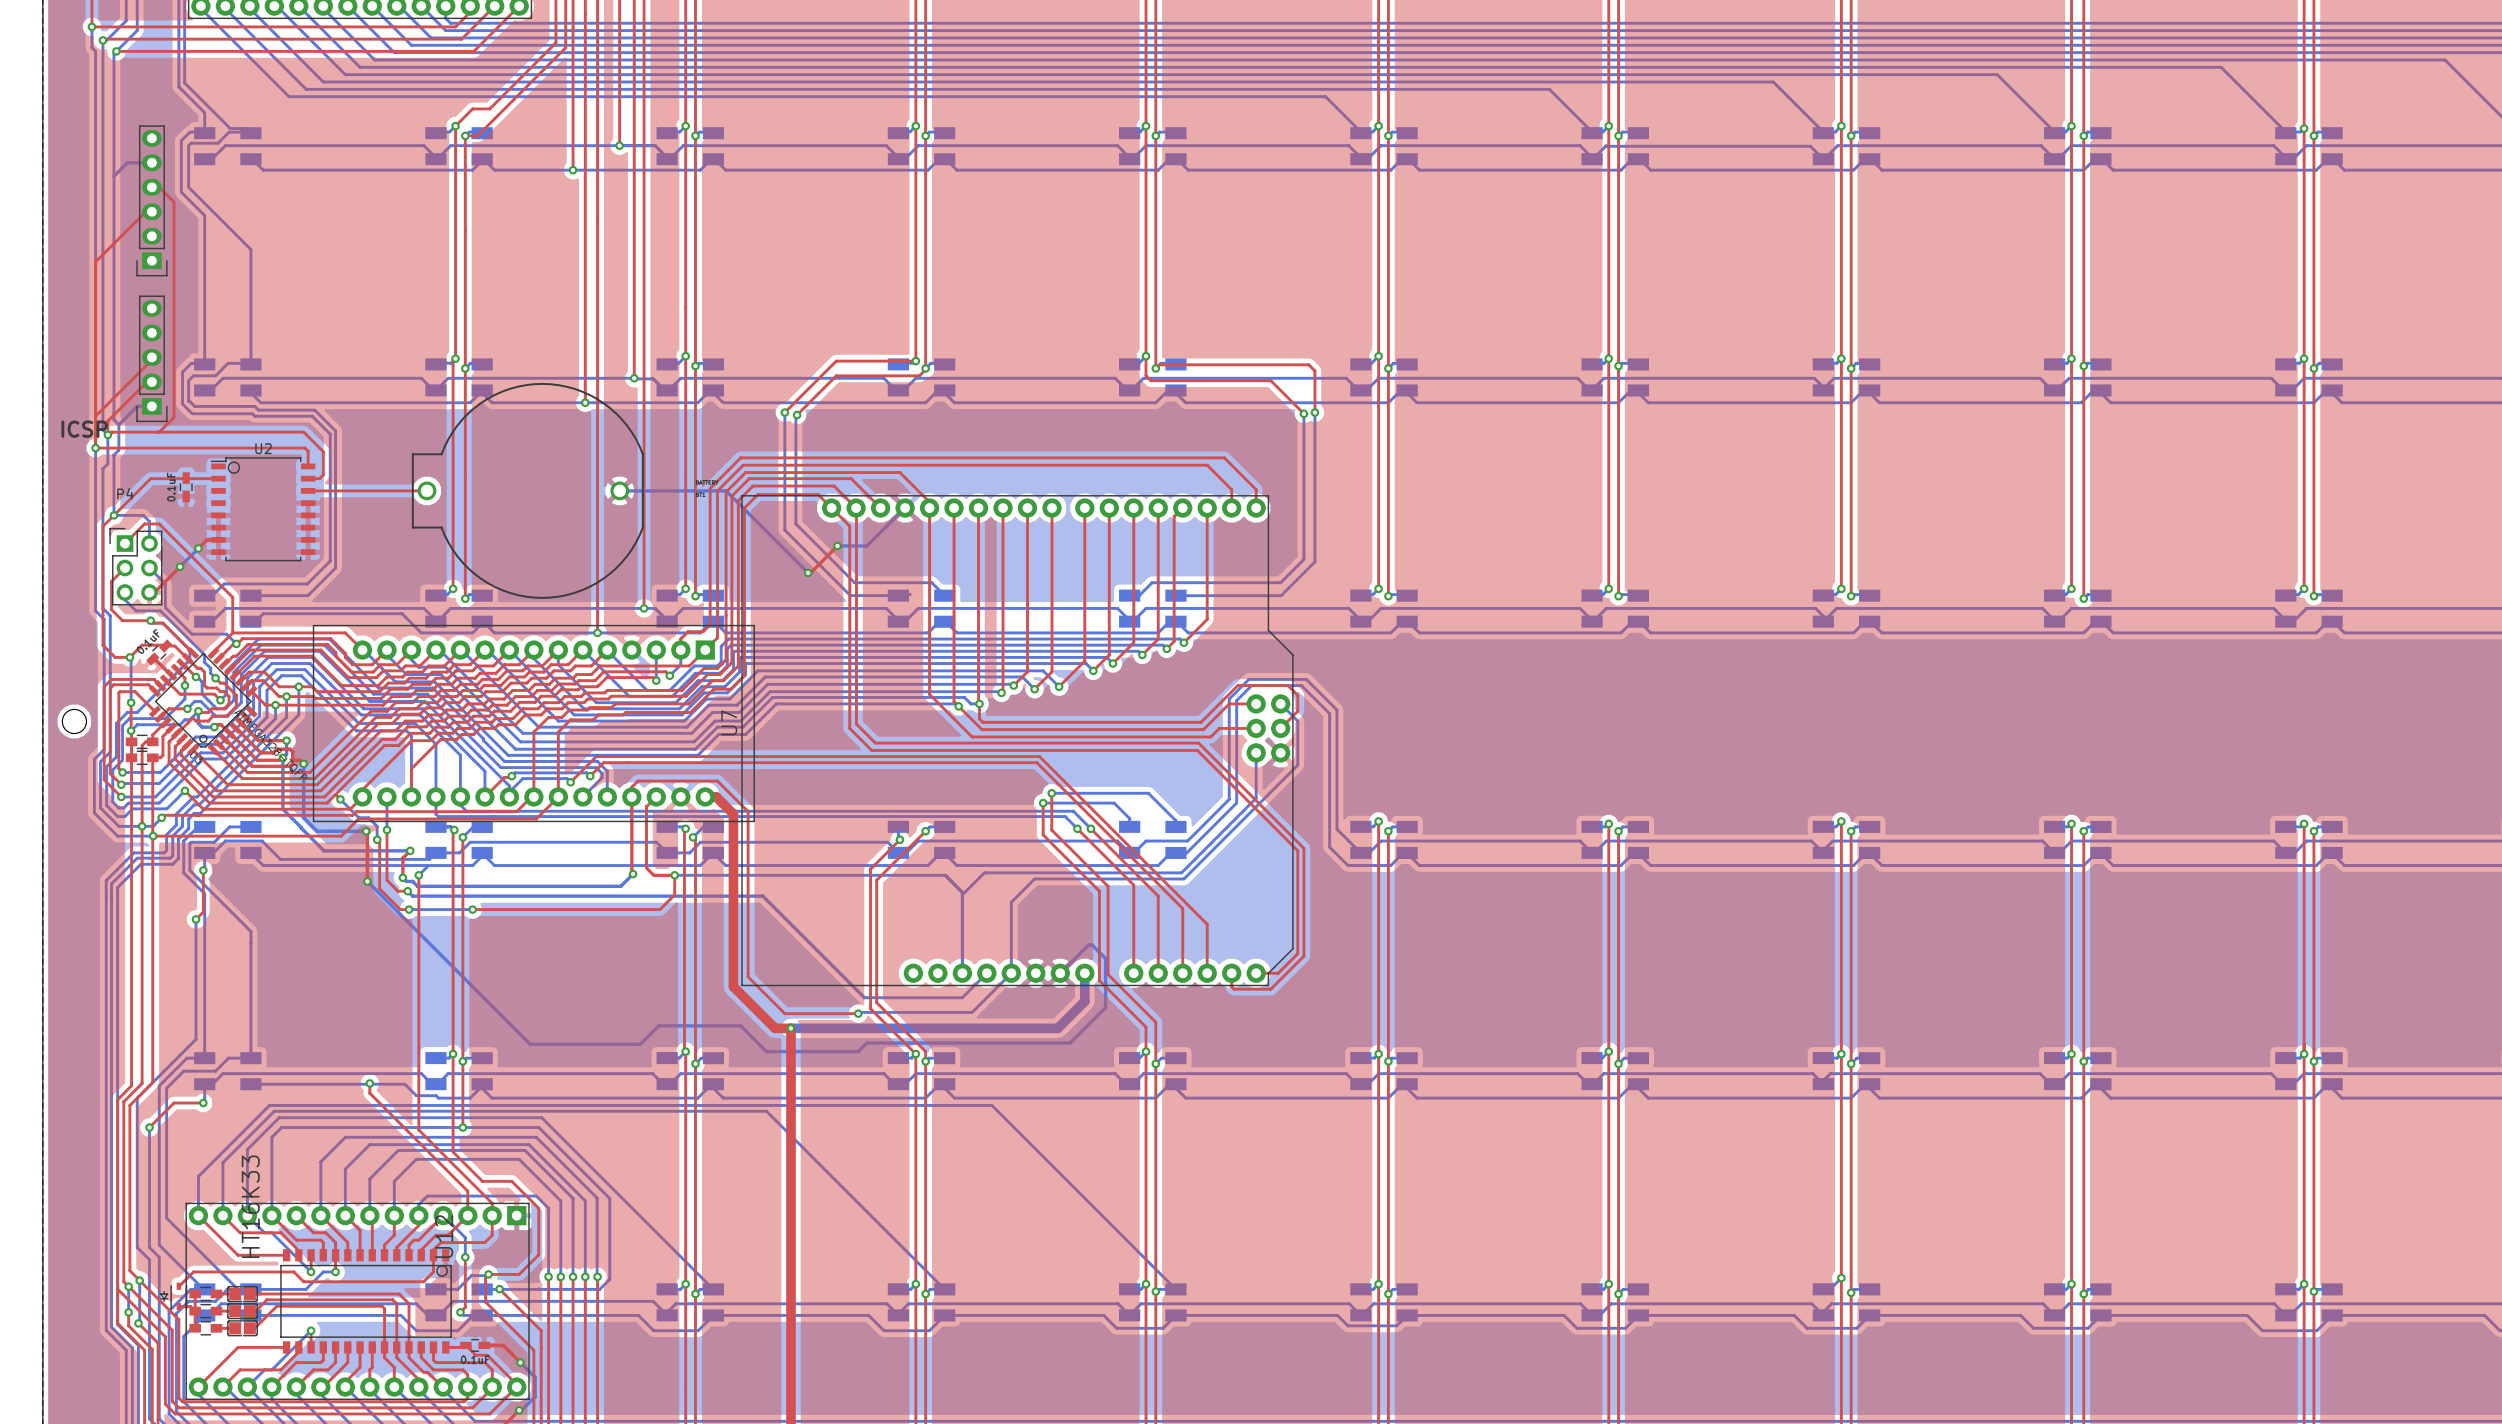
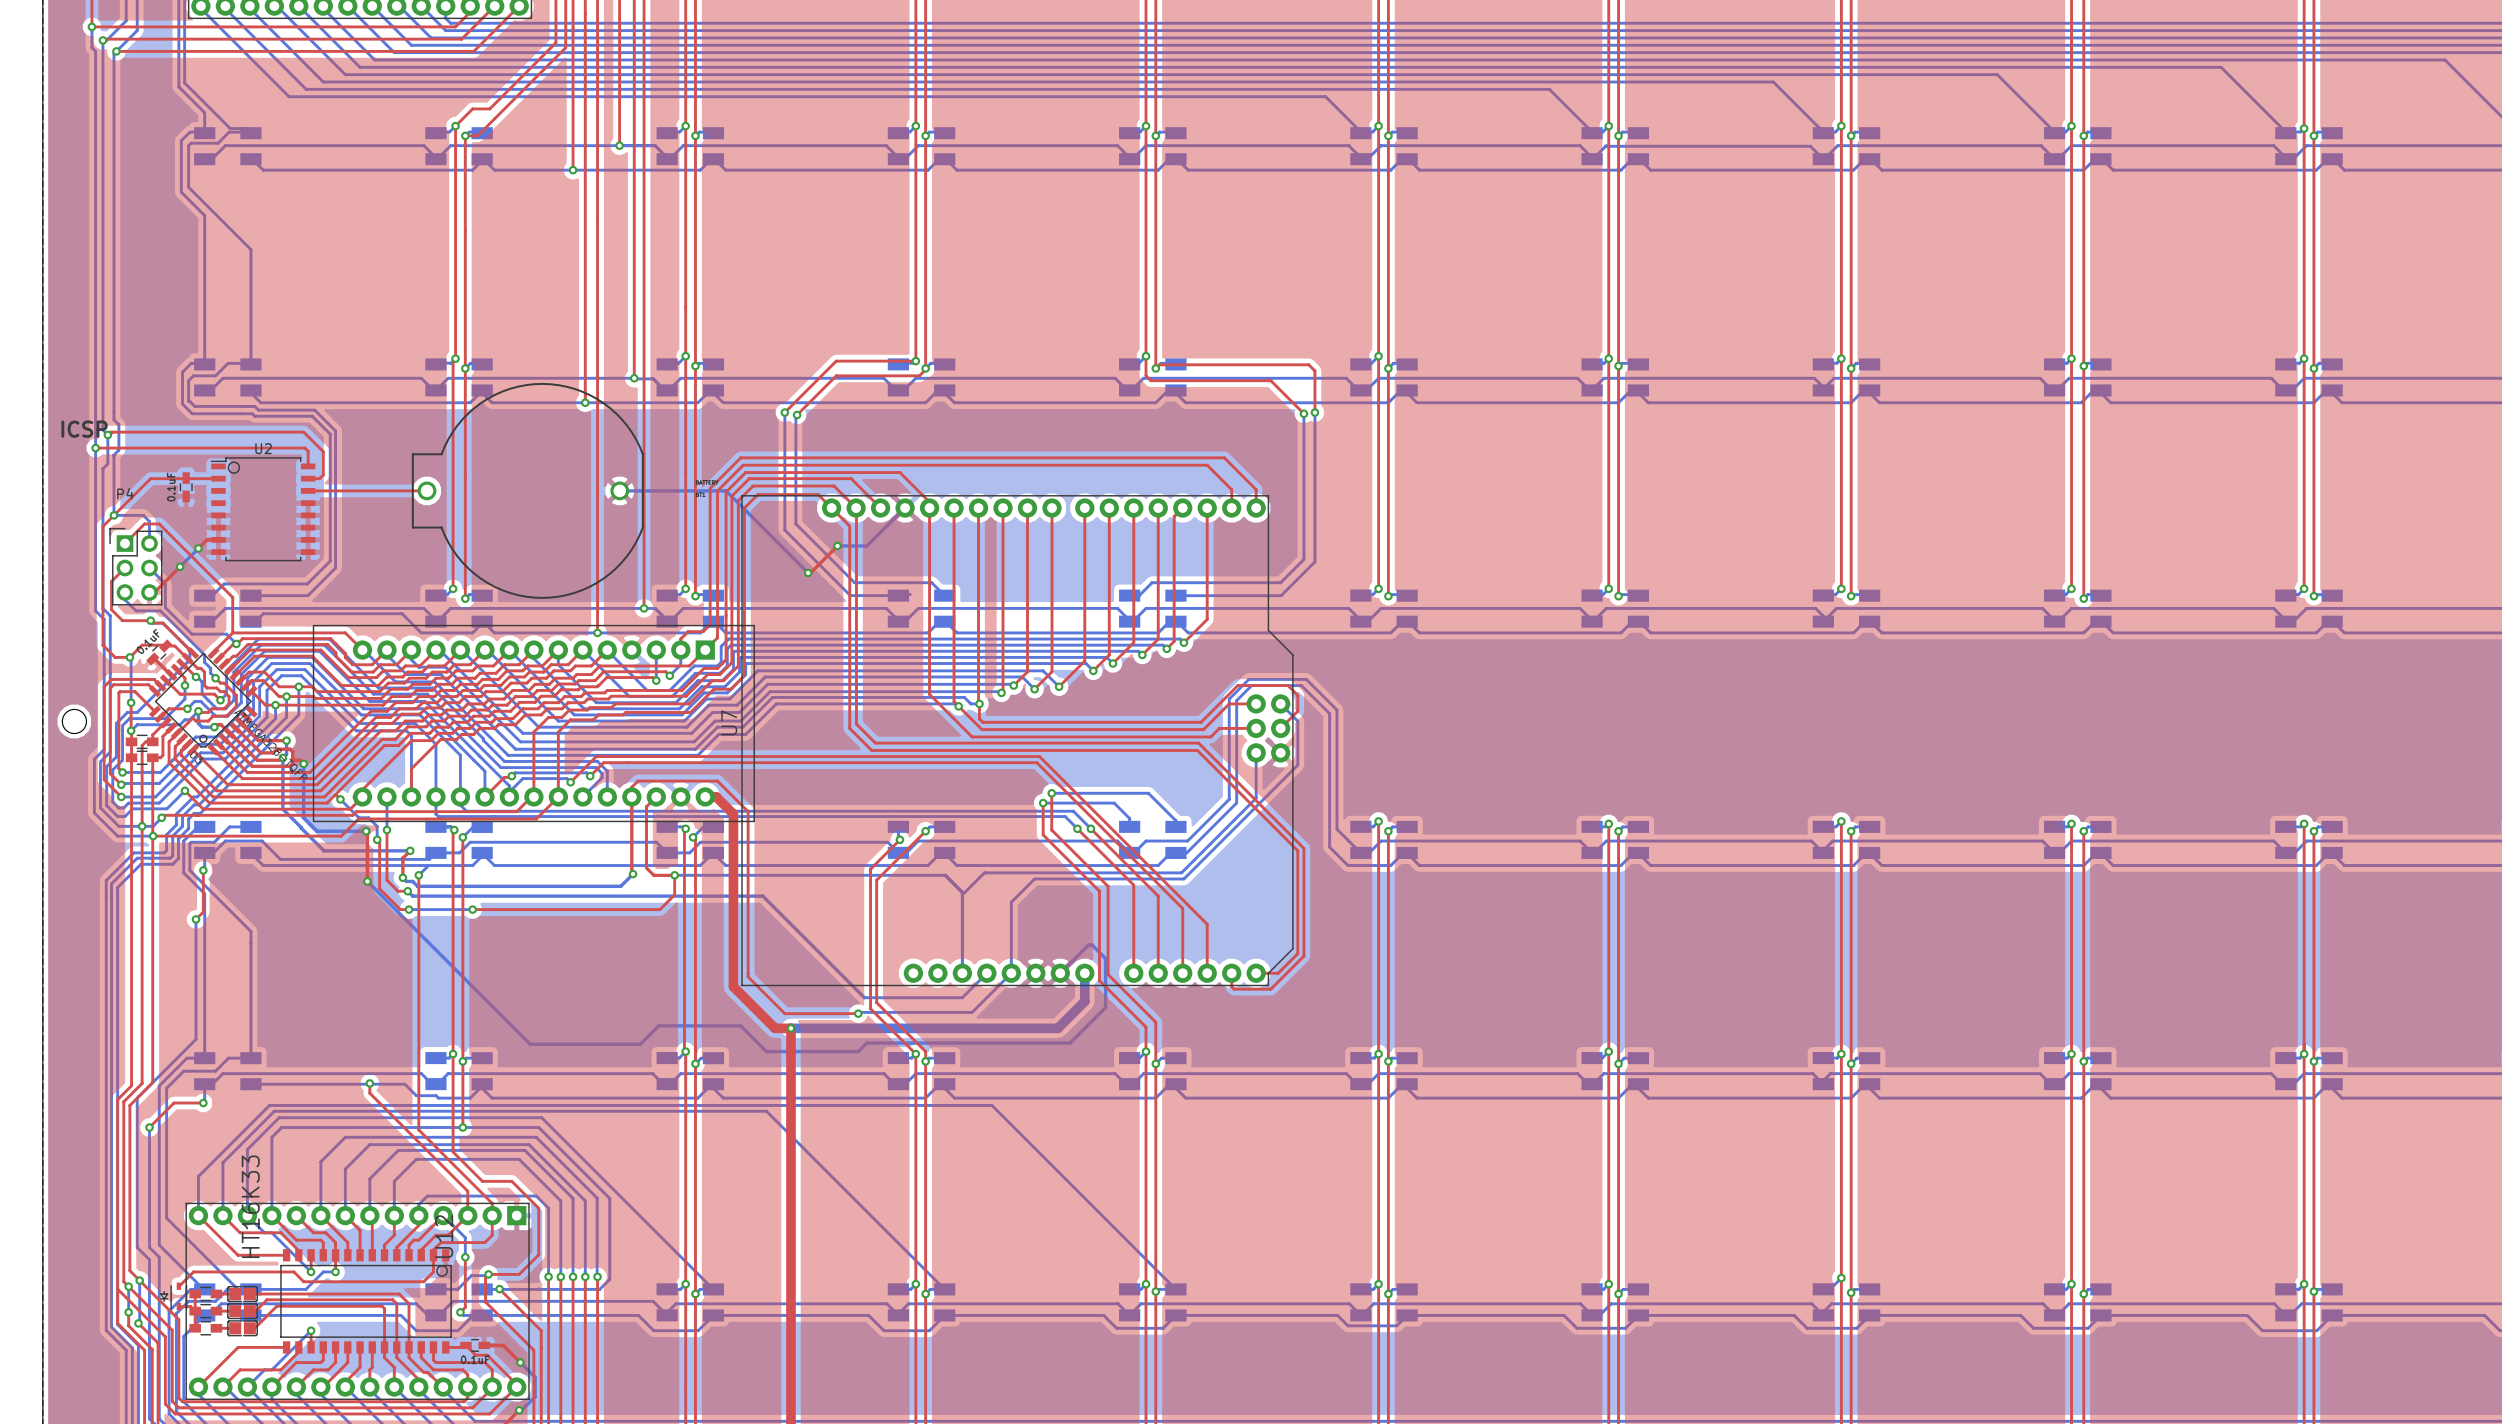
bottom track: (151, 162) (127, 162) (113, 176) -> none
top track: (151, 187) (159, 187) (173, 201) (173, 417) (159, 432) -> none
part: (151, 200) -> none
top track: (151, 211) (145, 211) (95, 261) (95, 448) -> none
top track: (151, 357) (151, 359) (95, 416) -> none
part: (151, 358) -> none
top track: (151, 381) (147, 381) (107, 421) (107, 434) -> none
bottom track: (151, 406) (137, 406) (118, 424) -> none

